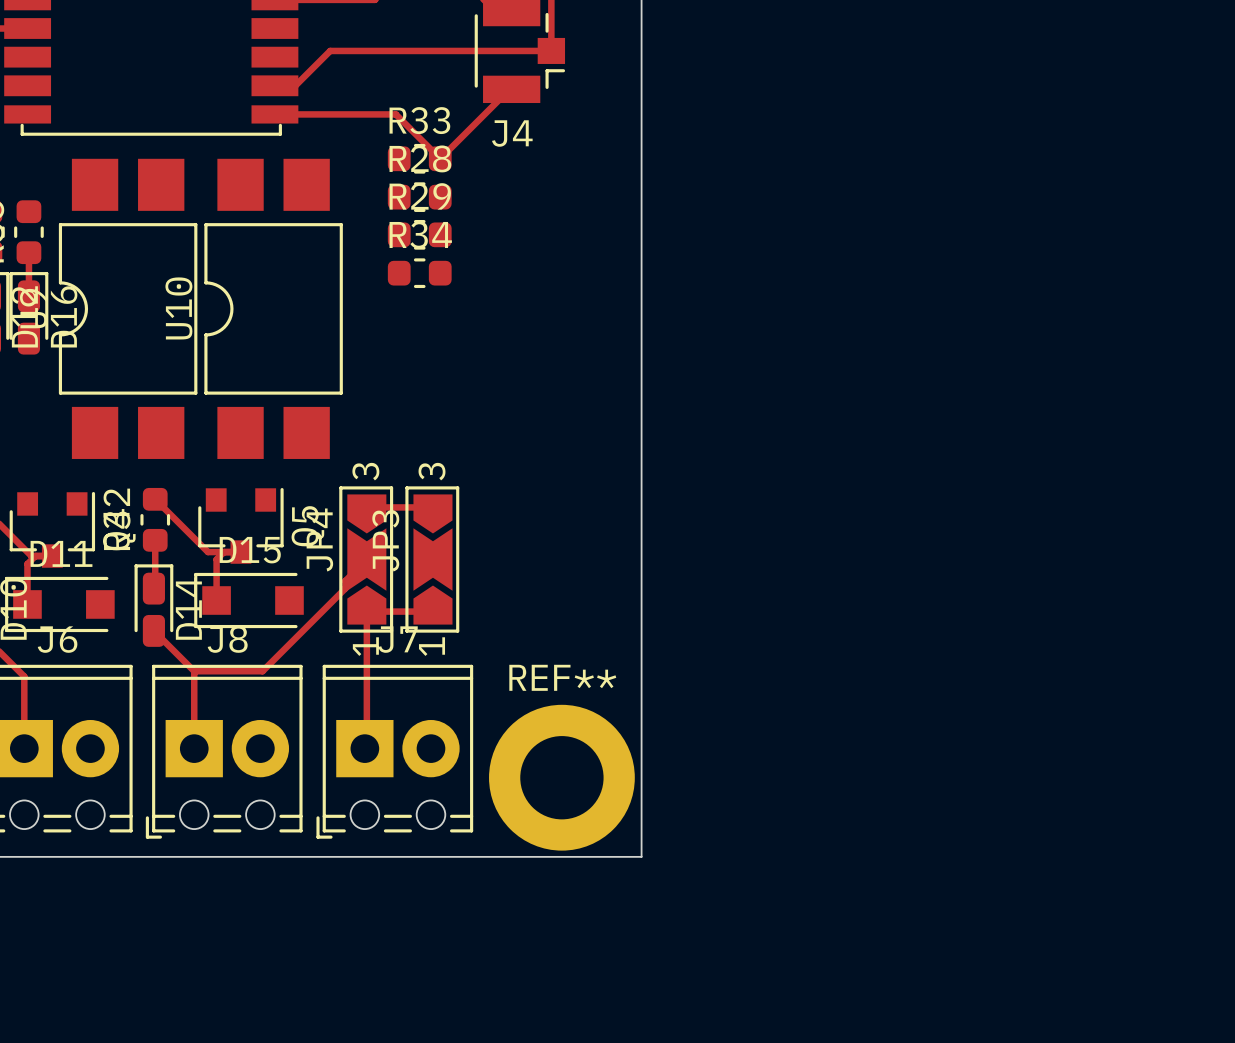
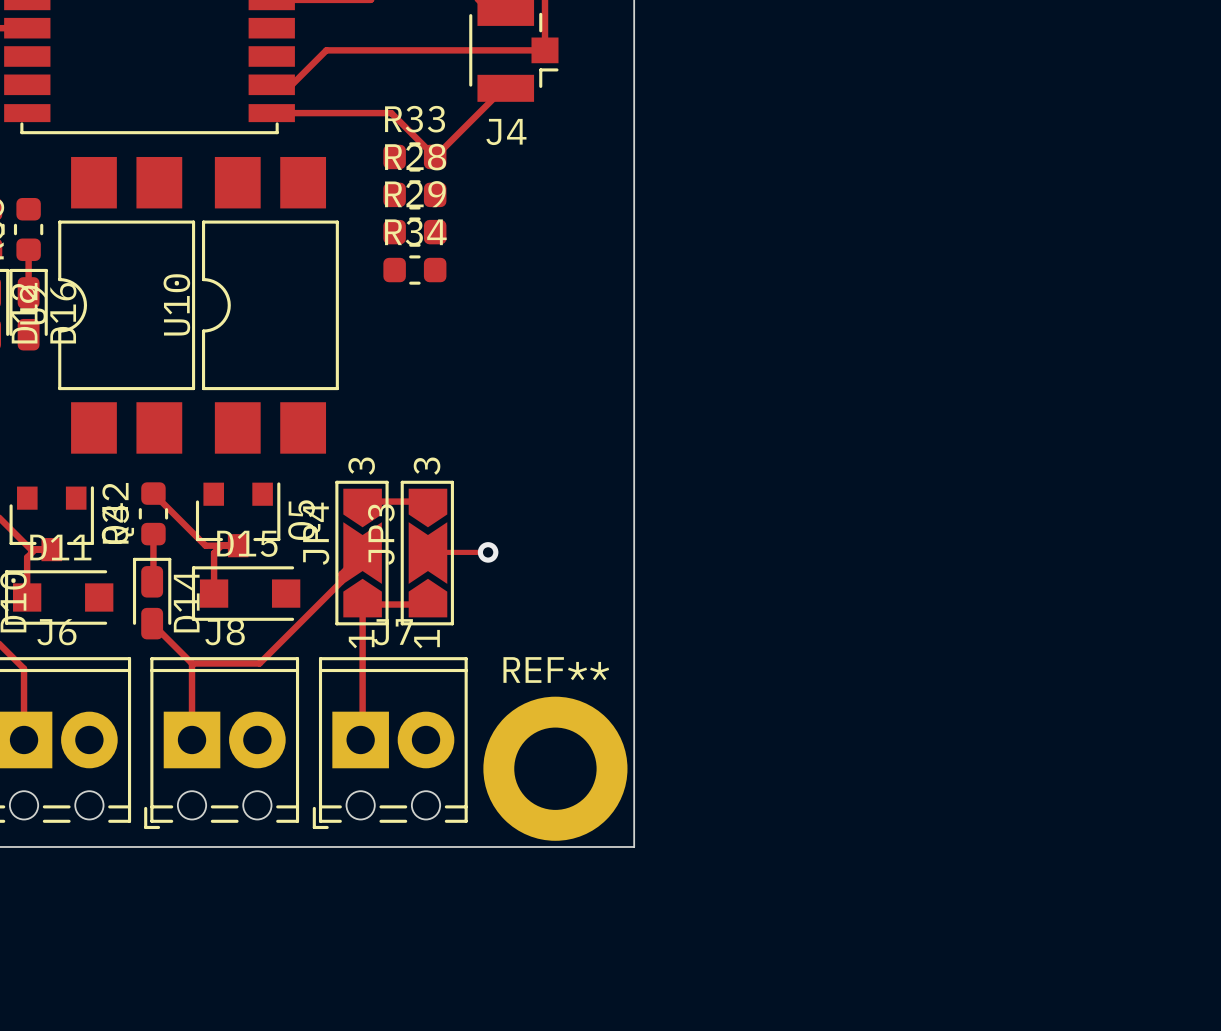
track: none -> (488, 552) (427, 553)
via: none -> (488, 552)

